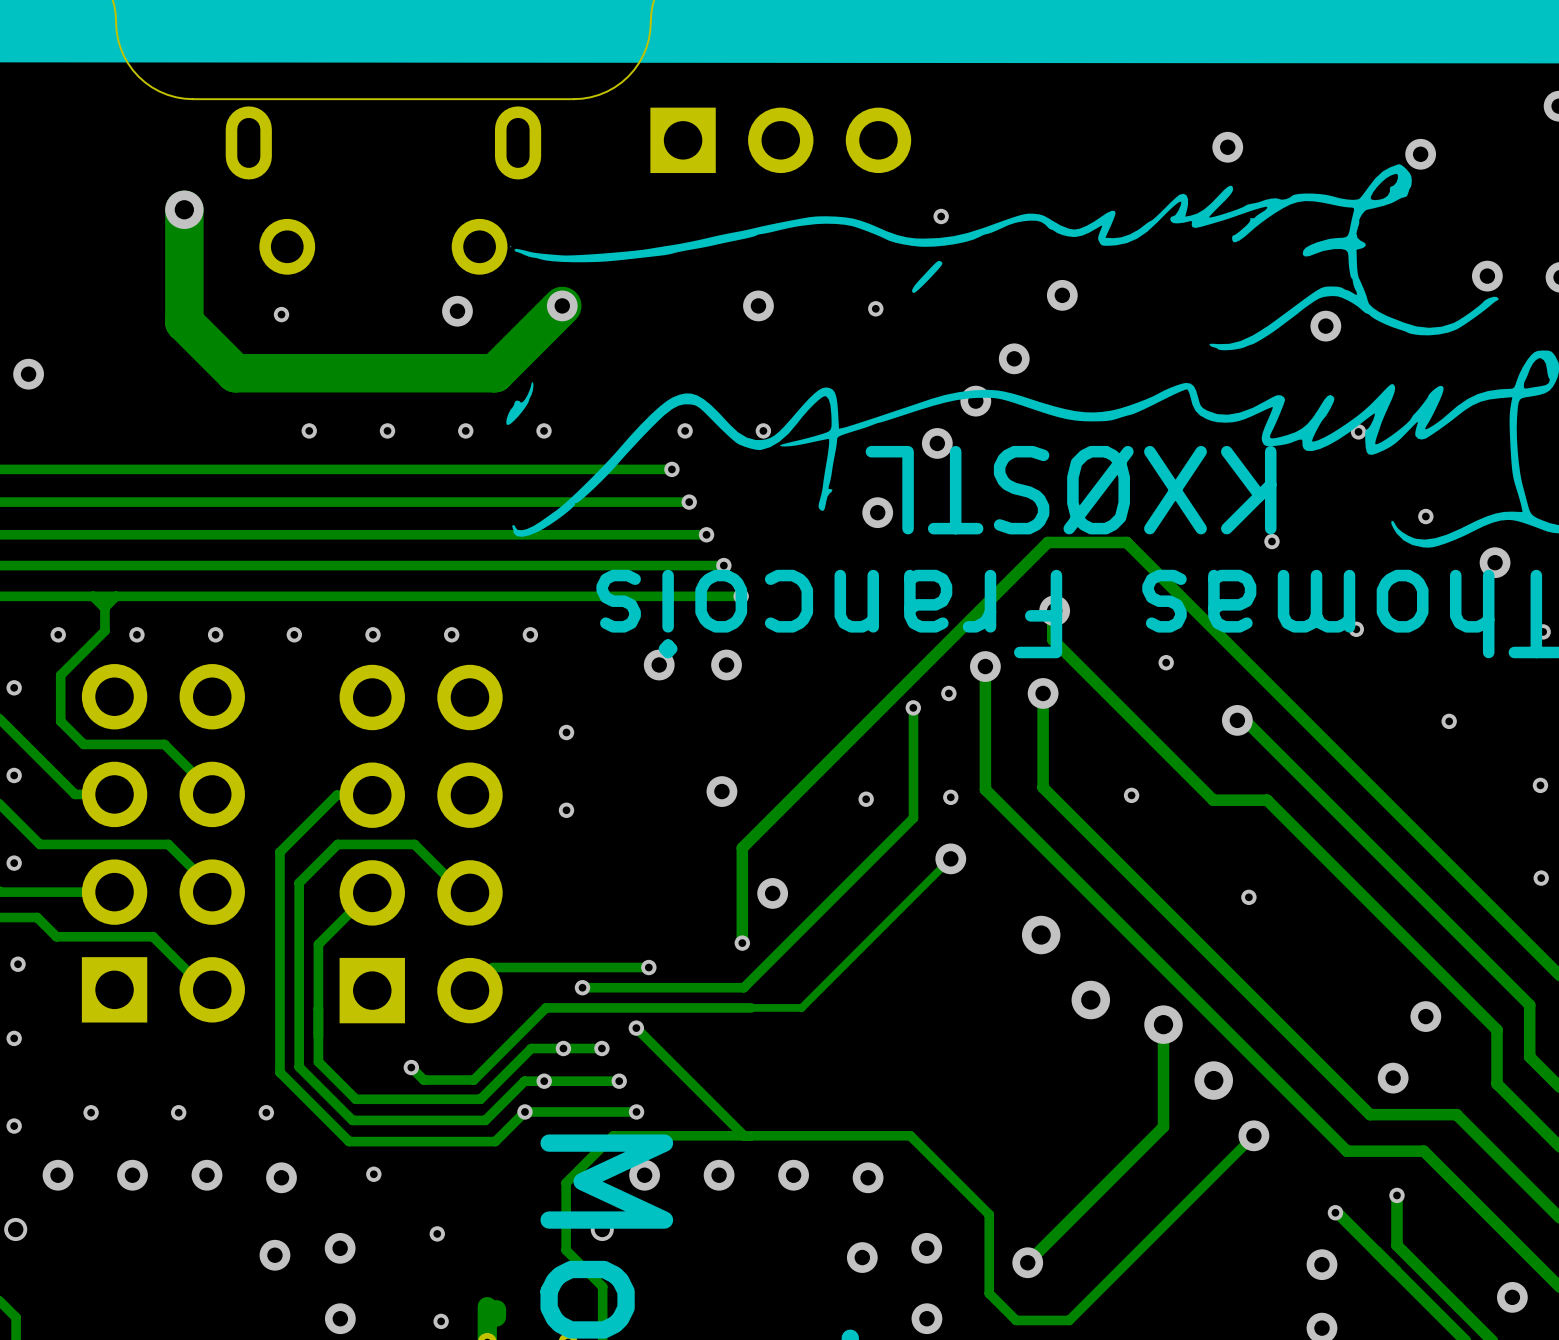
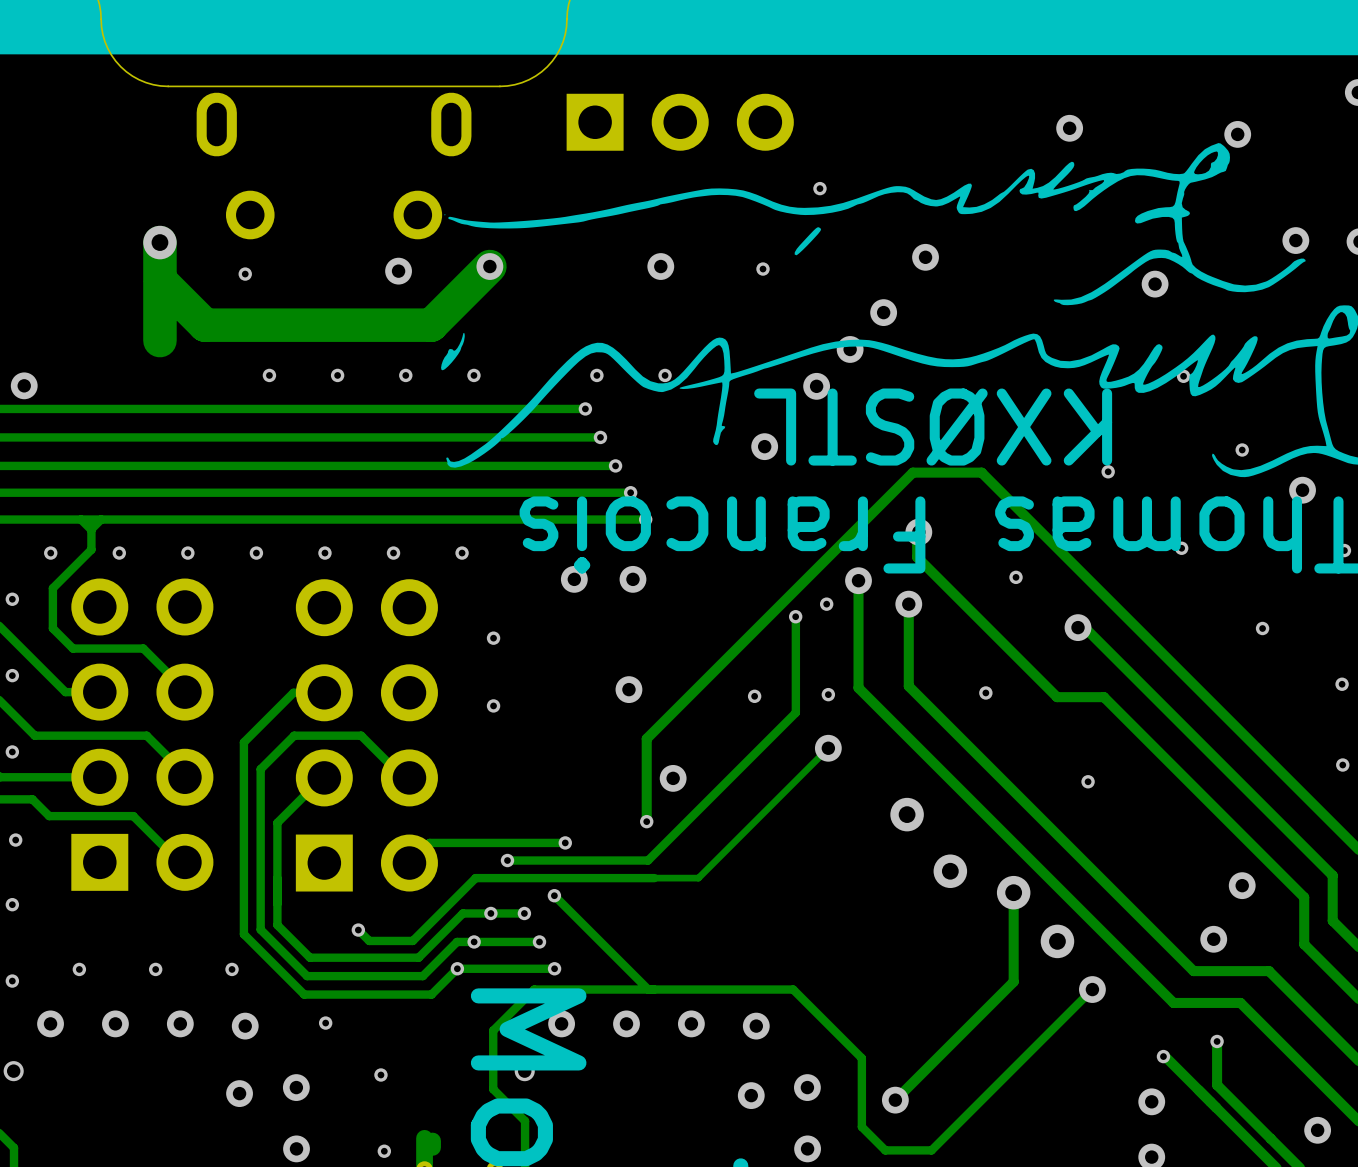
track: (184, 209) (184, 322) -> (159, 242) (159, 340)
via position: (184, 209) -> (159, 242)
via: (28, 374) -> none
via: none -> (24, 385)

